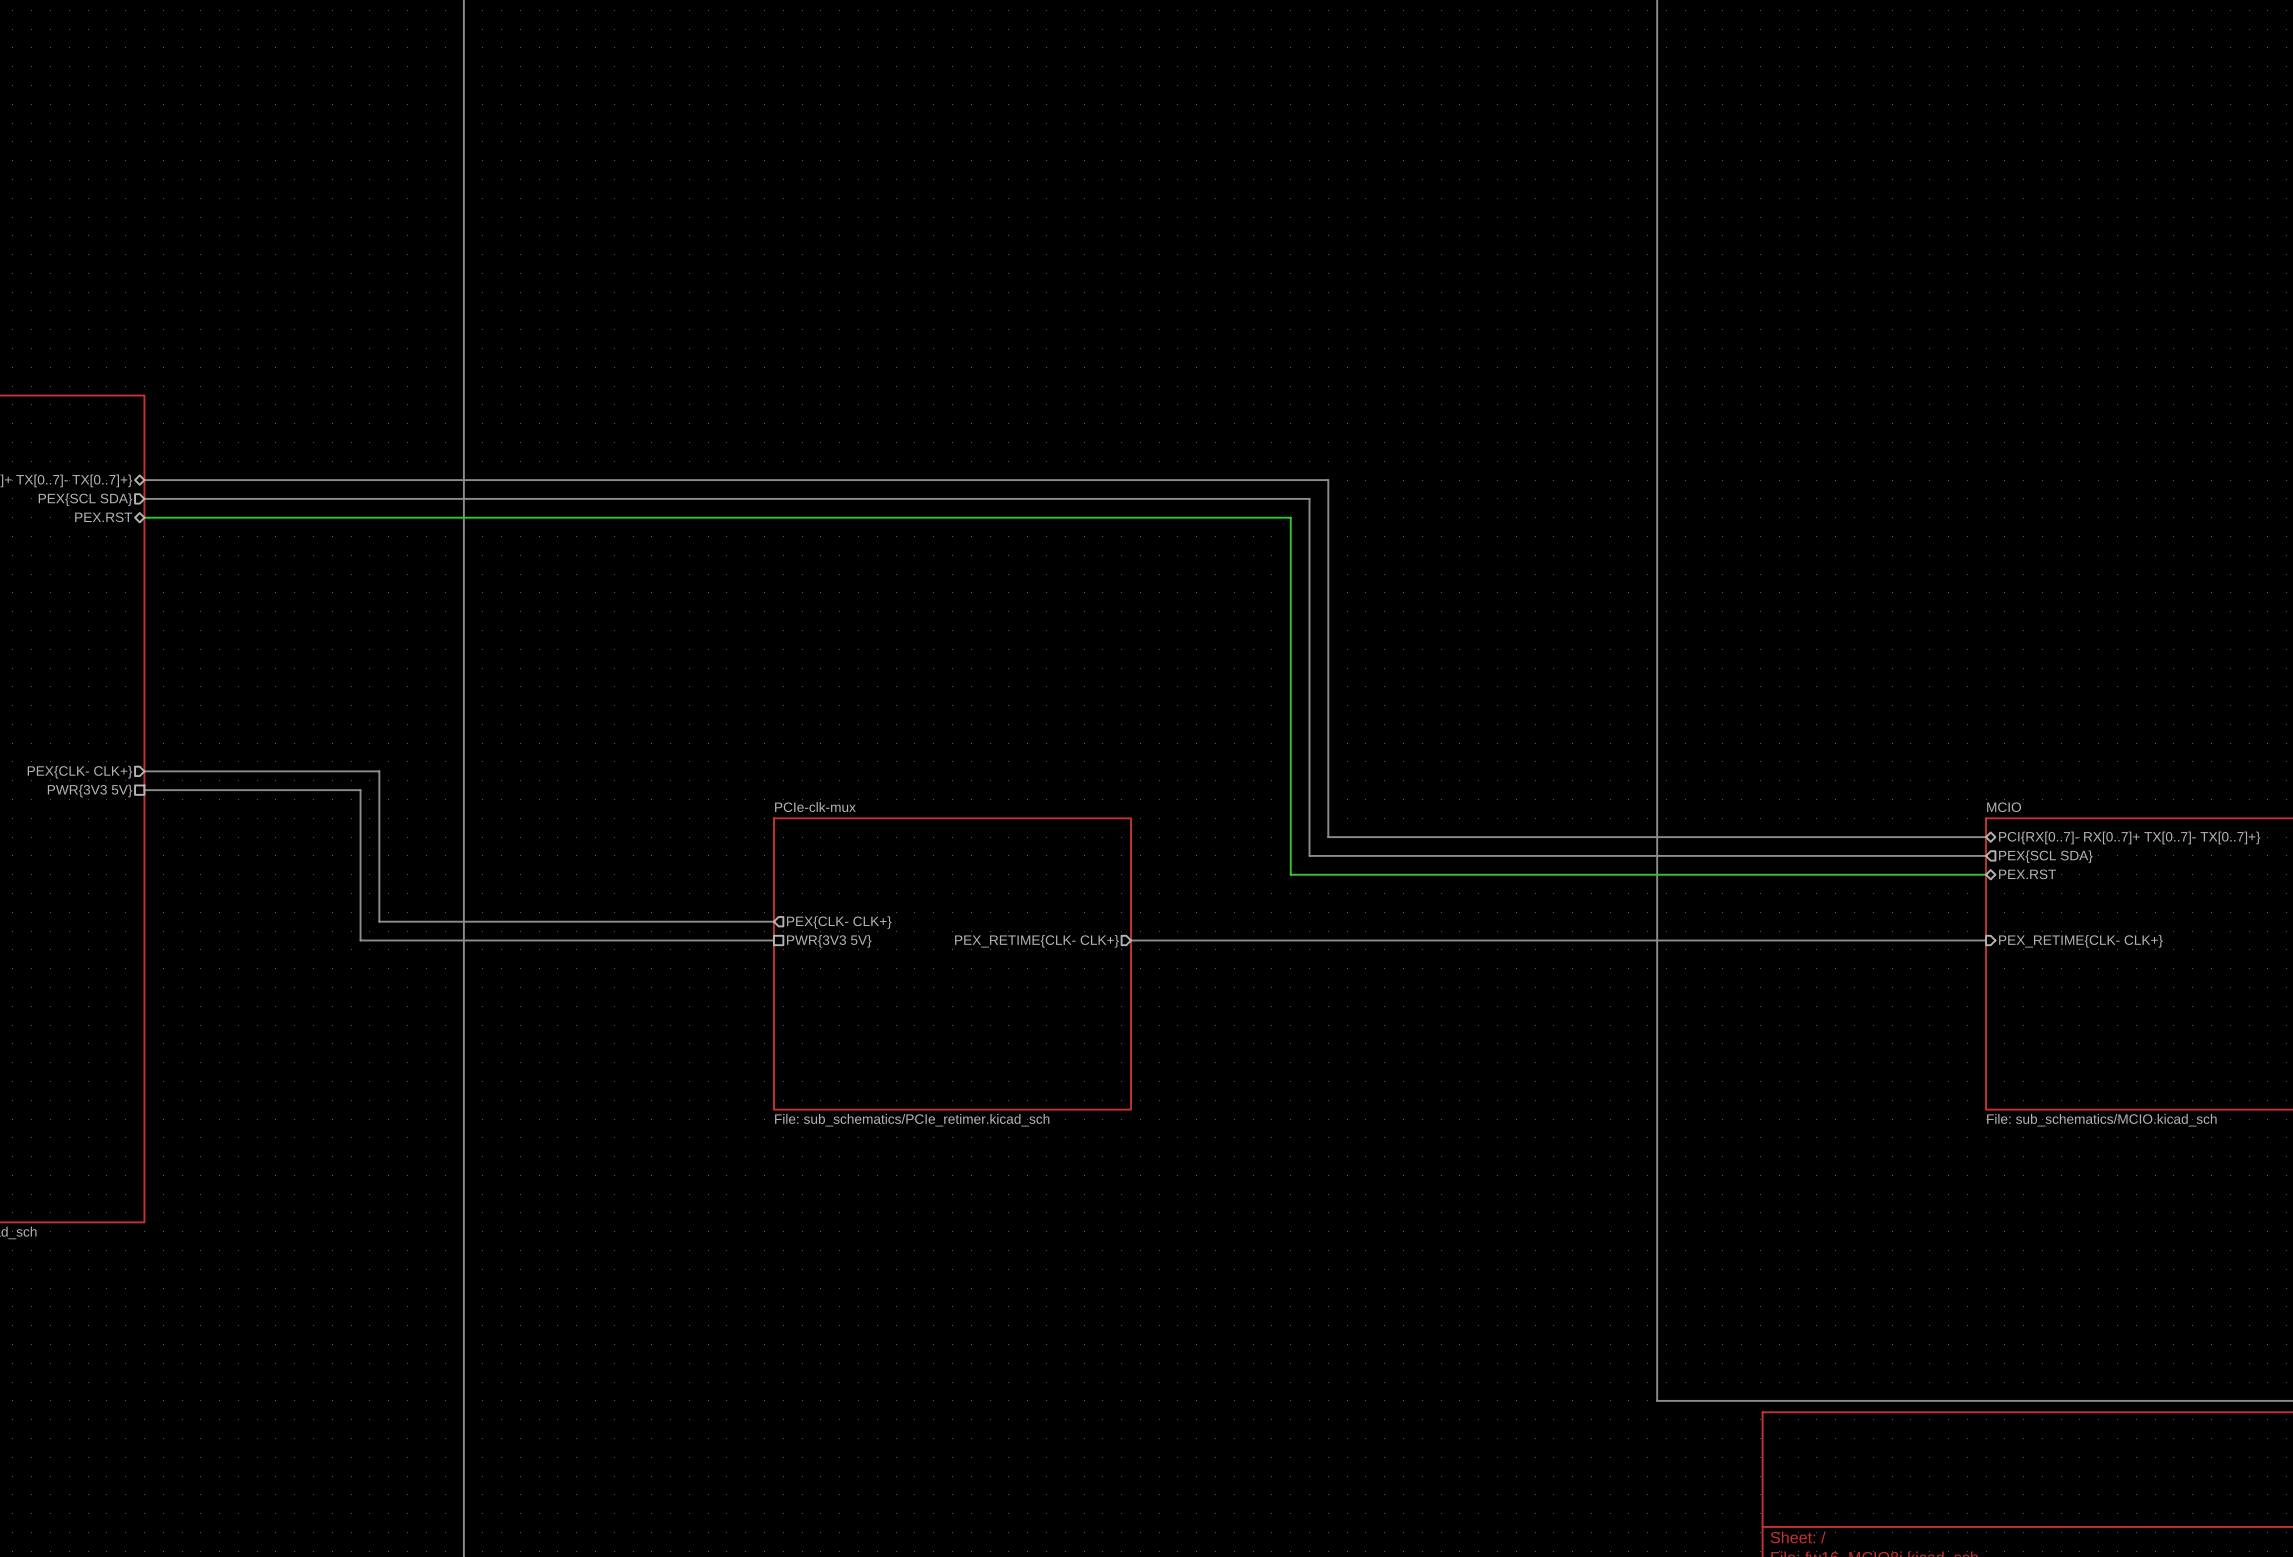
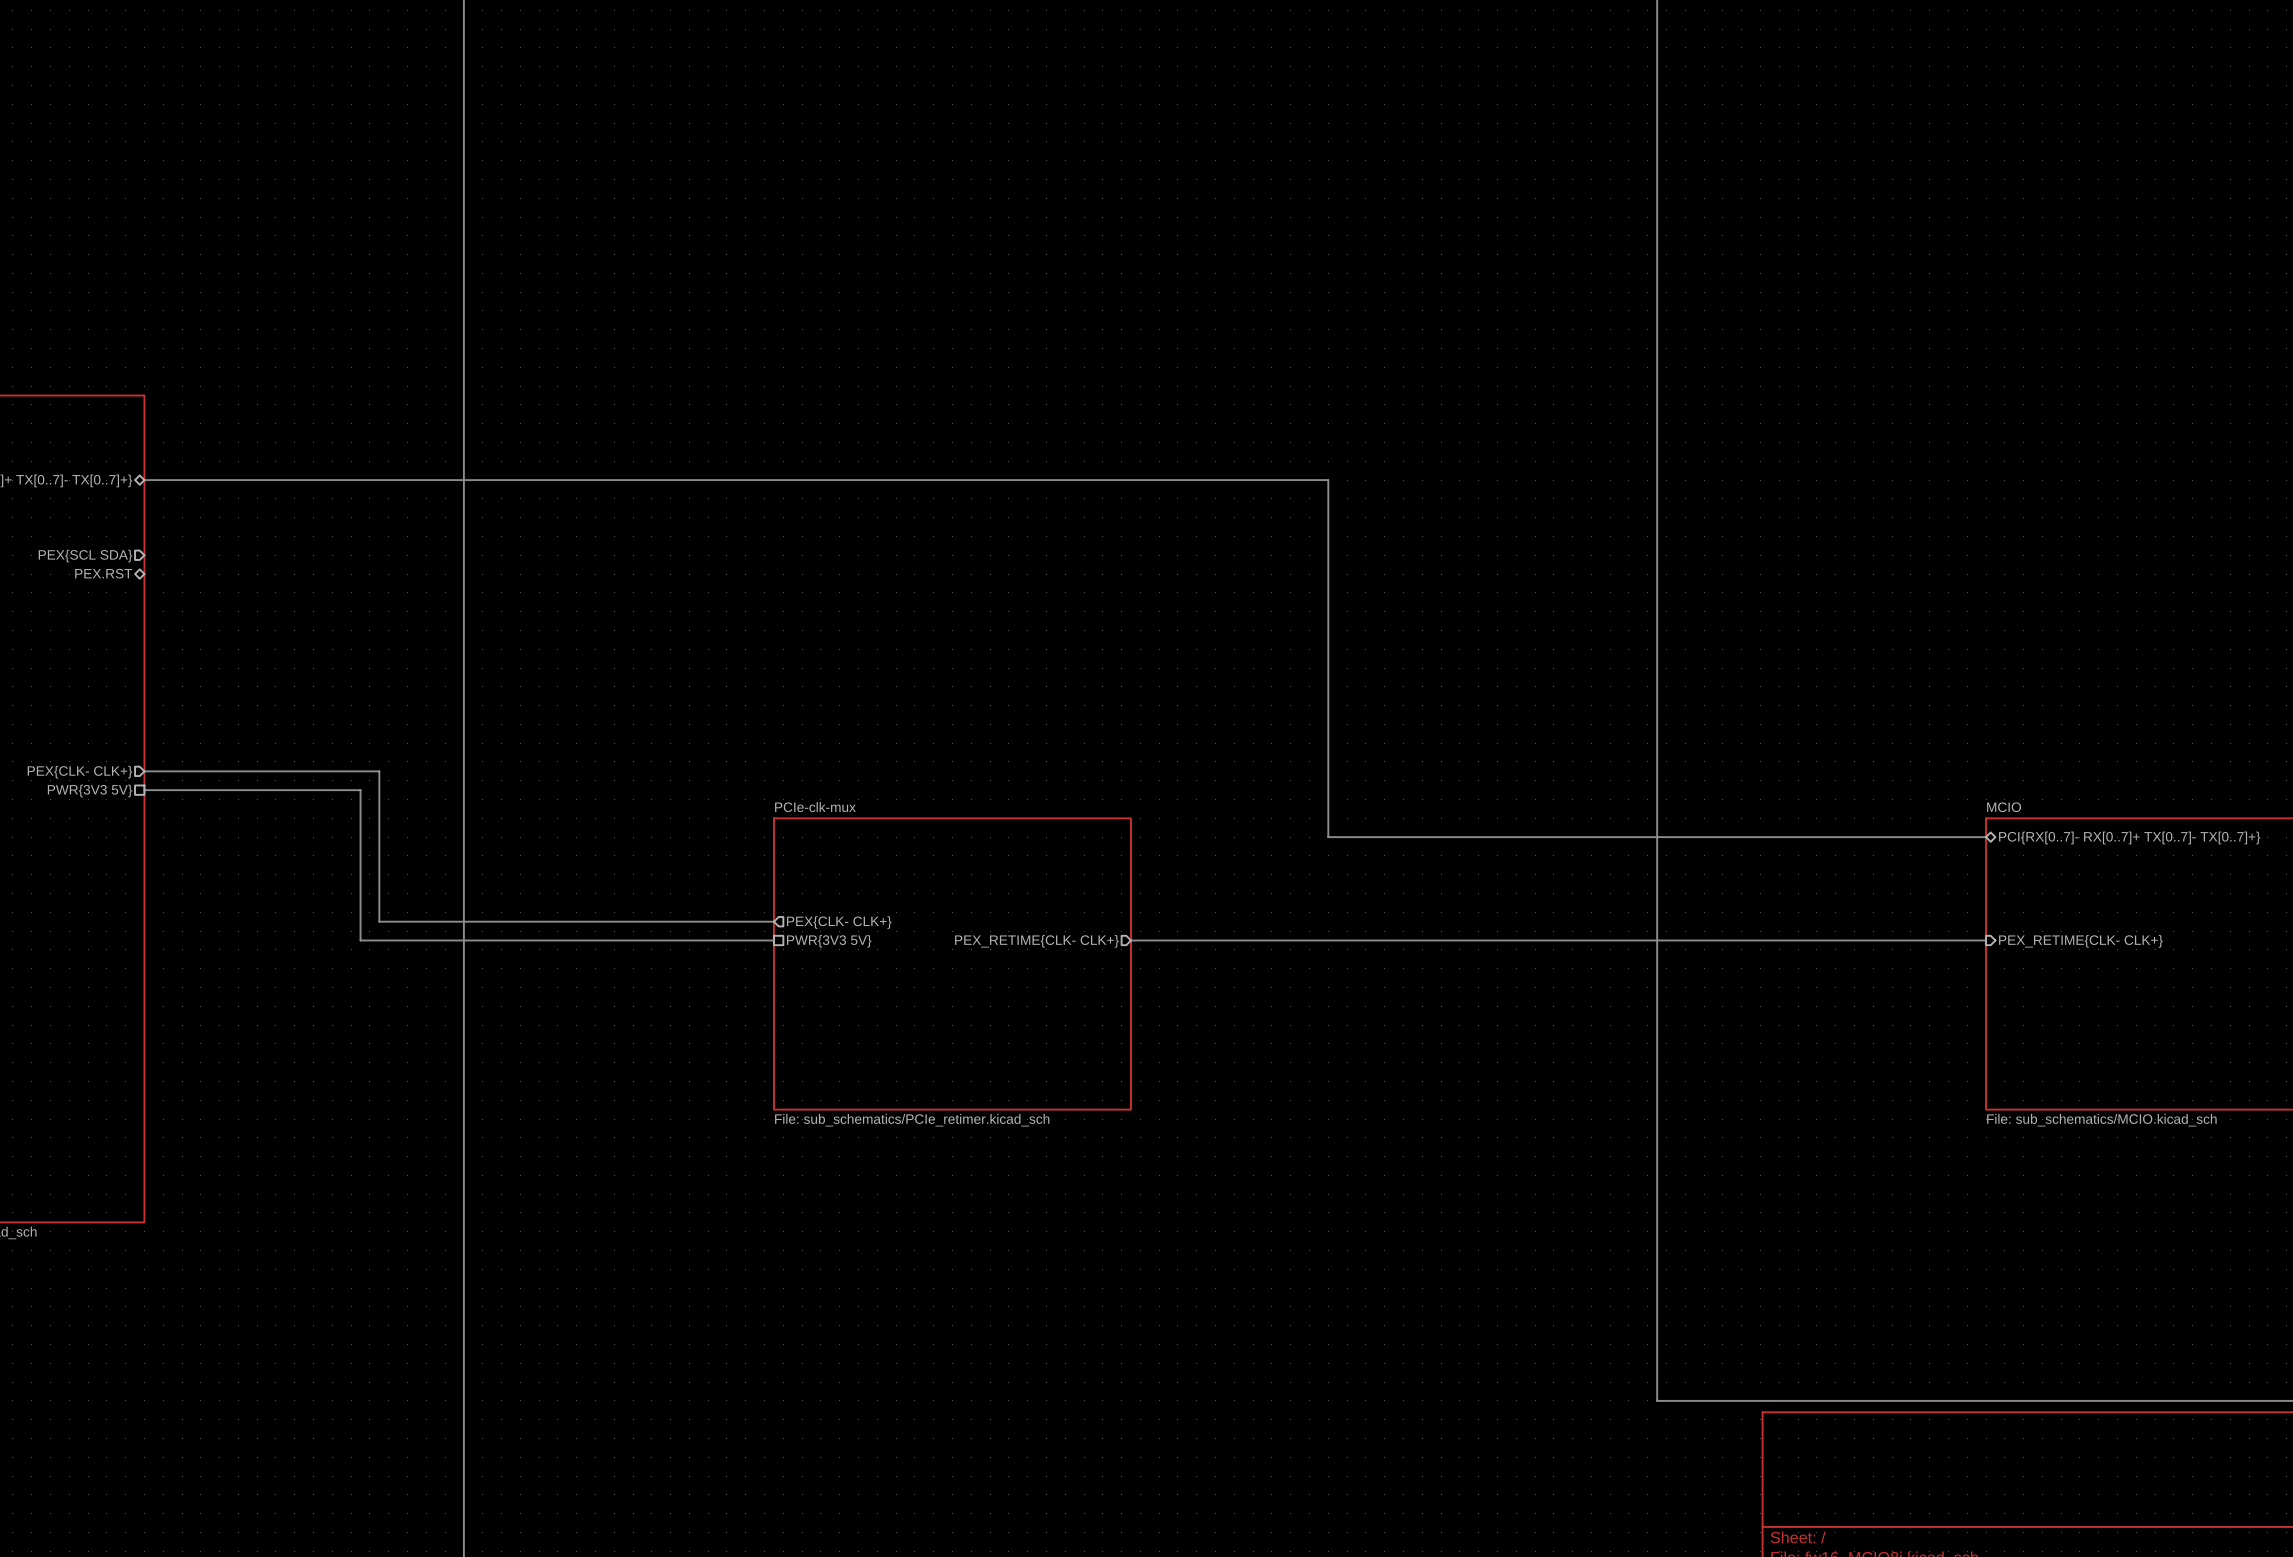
bus: (144, 498) (1309, 498) (1309, 855) (1986, 855) -> none
sheet pin position: PEX{SCL SDA} (85, 499) -> PEX{SCL SDA} (85, 556)
sheet pin position: PEX.RST (103, 517) -> PEX.RST (103, 573)
wire: (144, 517) (1290, 517) (1290, 874) (1986, 874) -> none
sheet pin: PEX{SCL SDA} (2045, 856) -> none
sheet pin: PEX.RST (2027, 874) -> none

